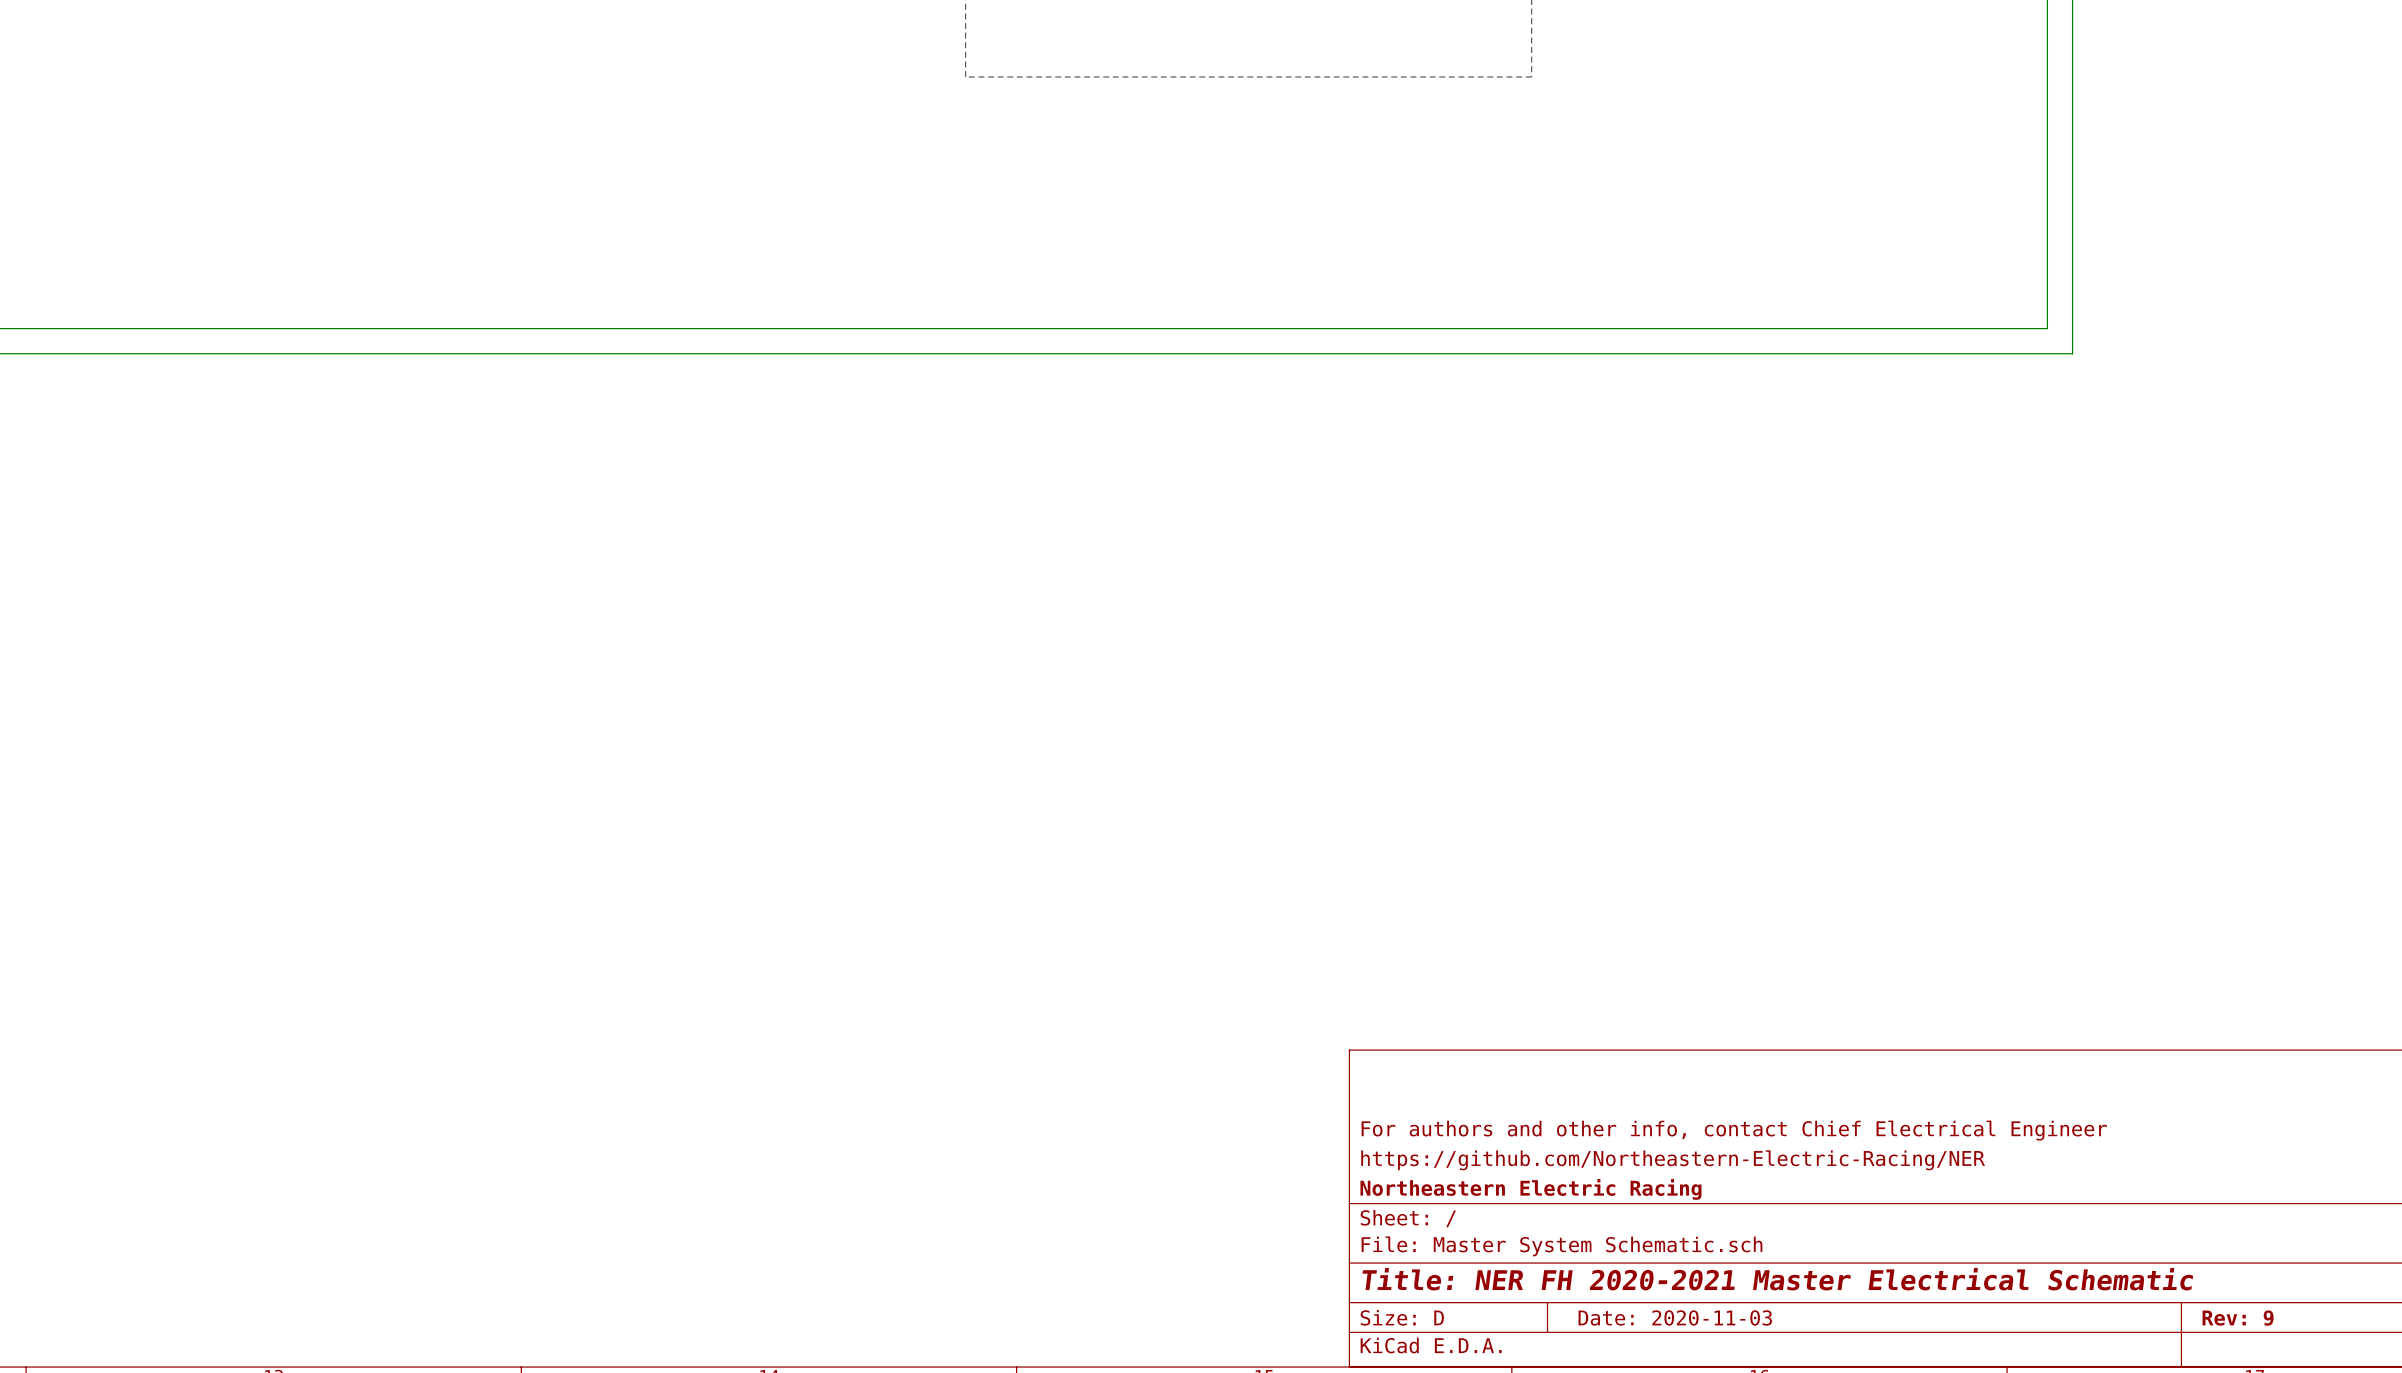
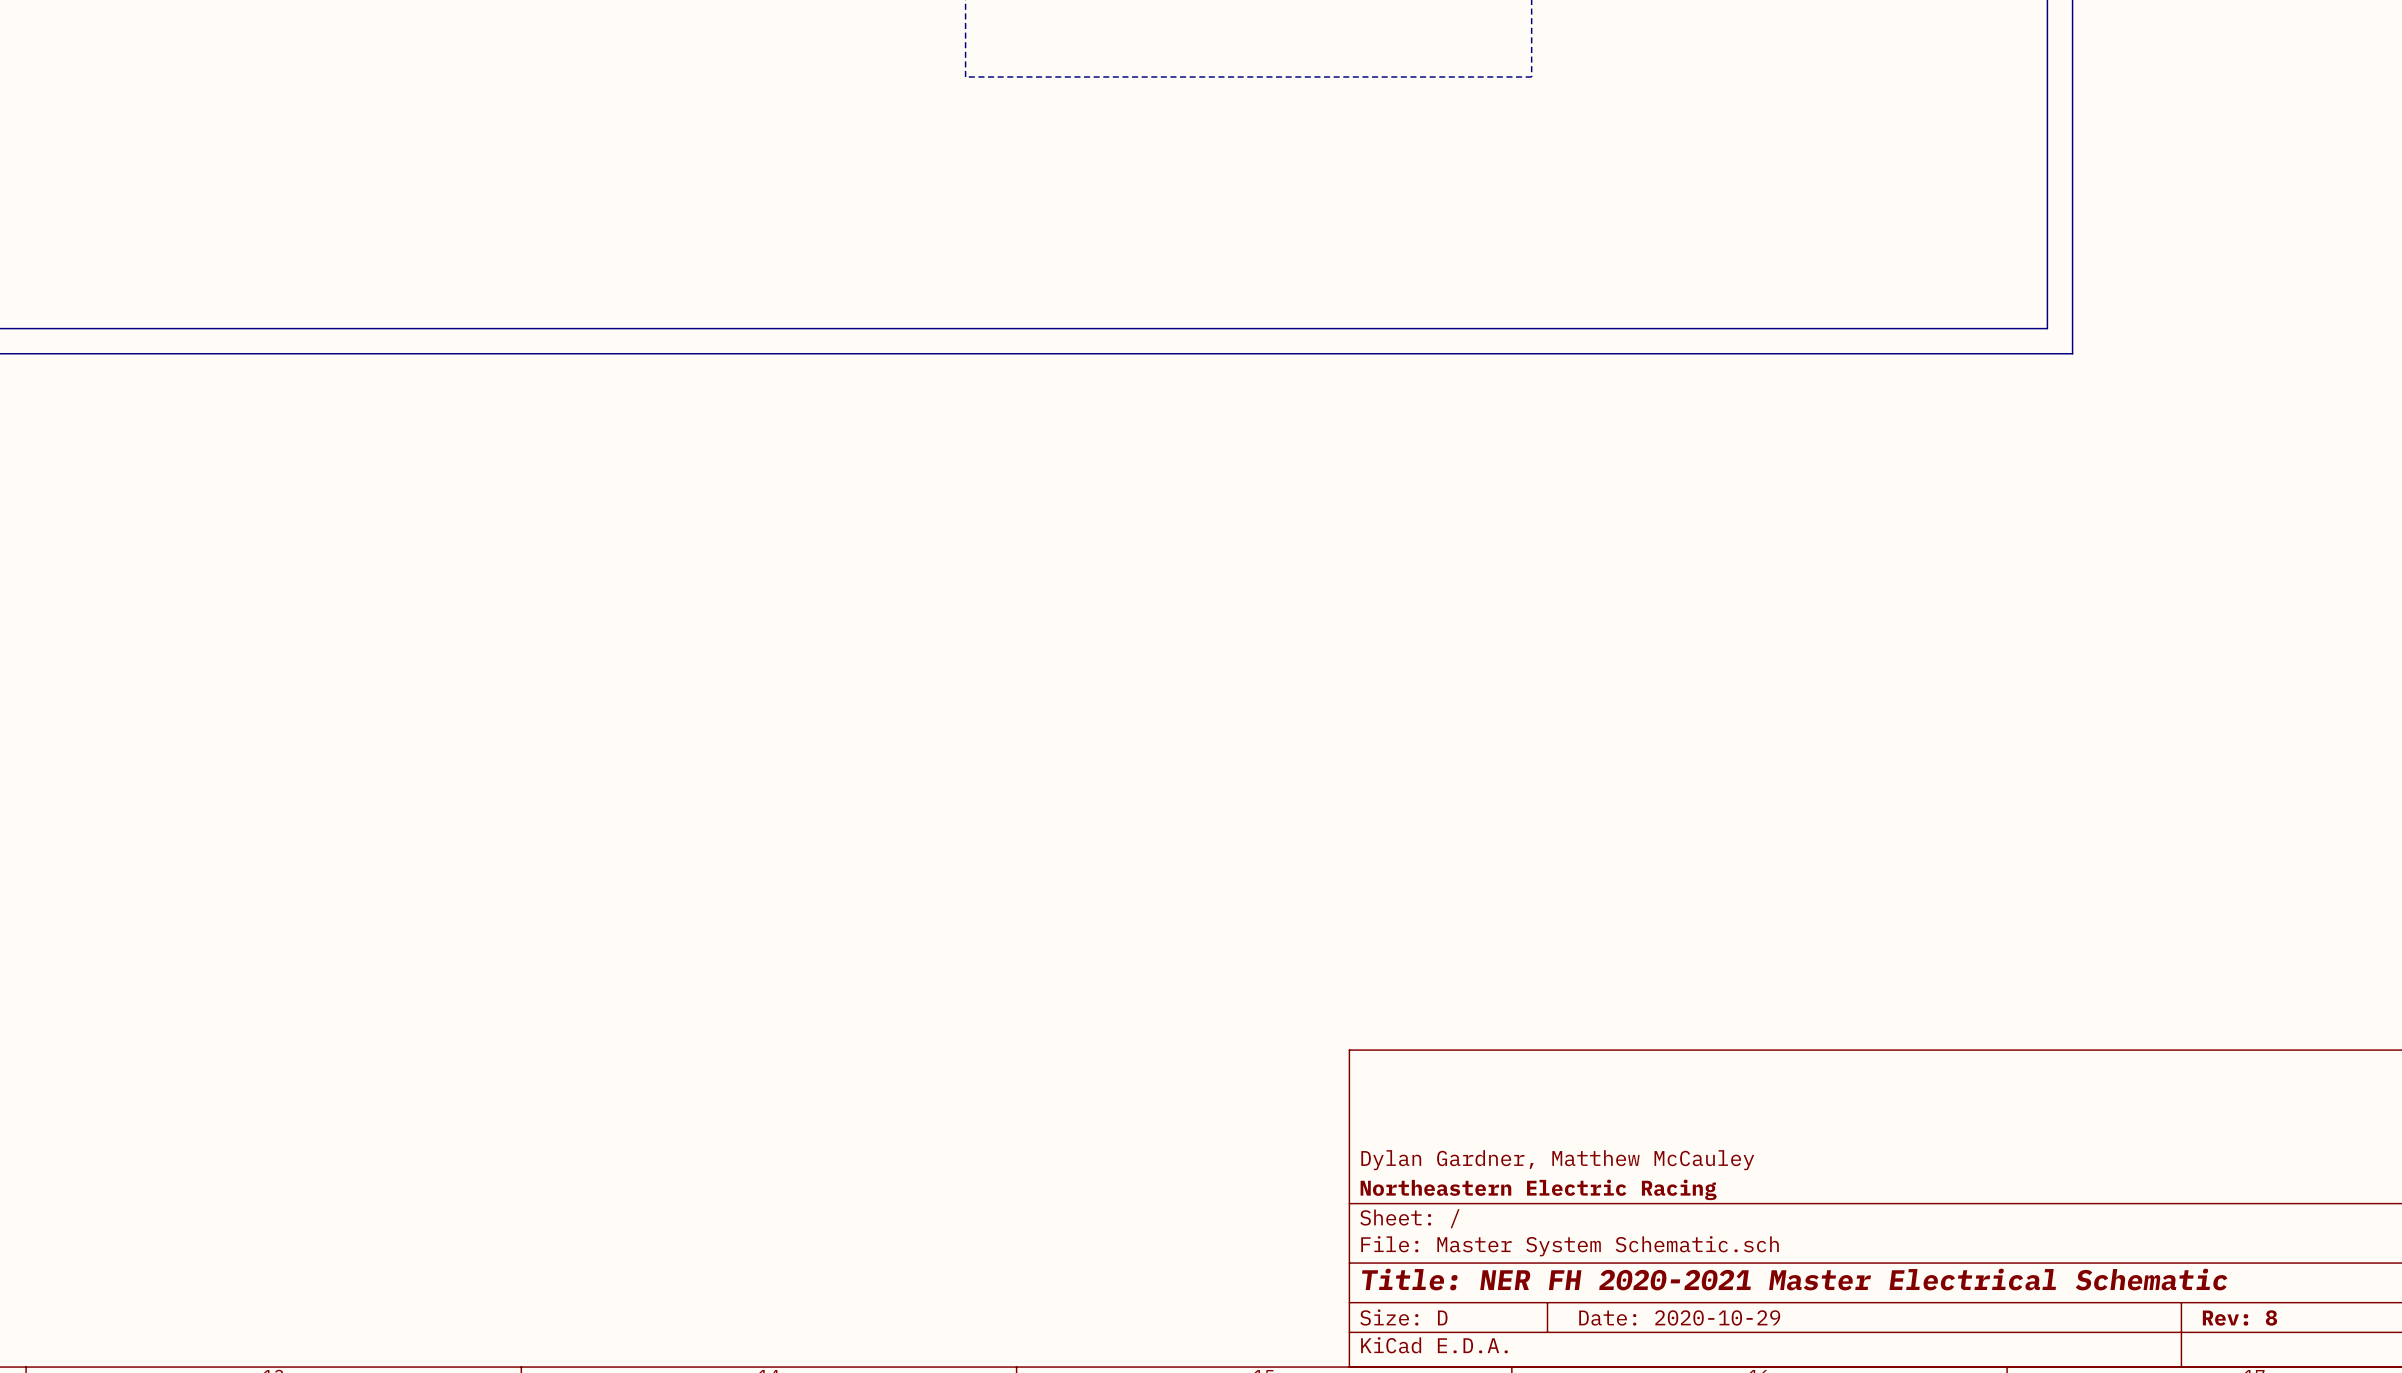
title block: For authors and other info, contact Chief Electrical Engineer (1734, 1130) -> none
title block: https://github.com/Northeastern-Electric-Racing/NER (1673, 1160) -> Dylan Gardner, Matthew McCauley (1557, 1160)
title block: Date: 2020-11-03 (1675, 1317) -> Date: 2020-10-29 (1679, 1317)
title block: Rev: 9 (2238, 1318) -> Rev: 8 (2239, 1317)

